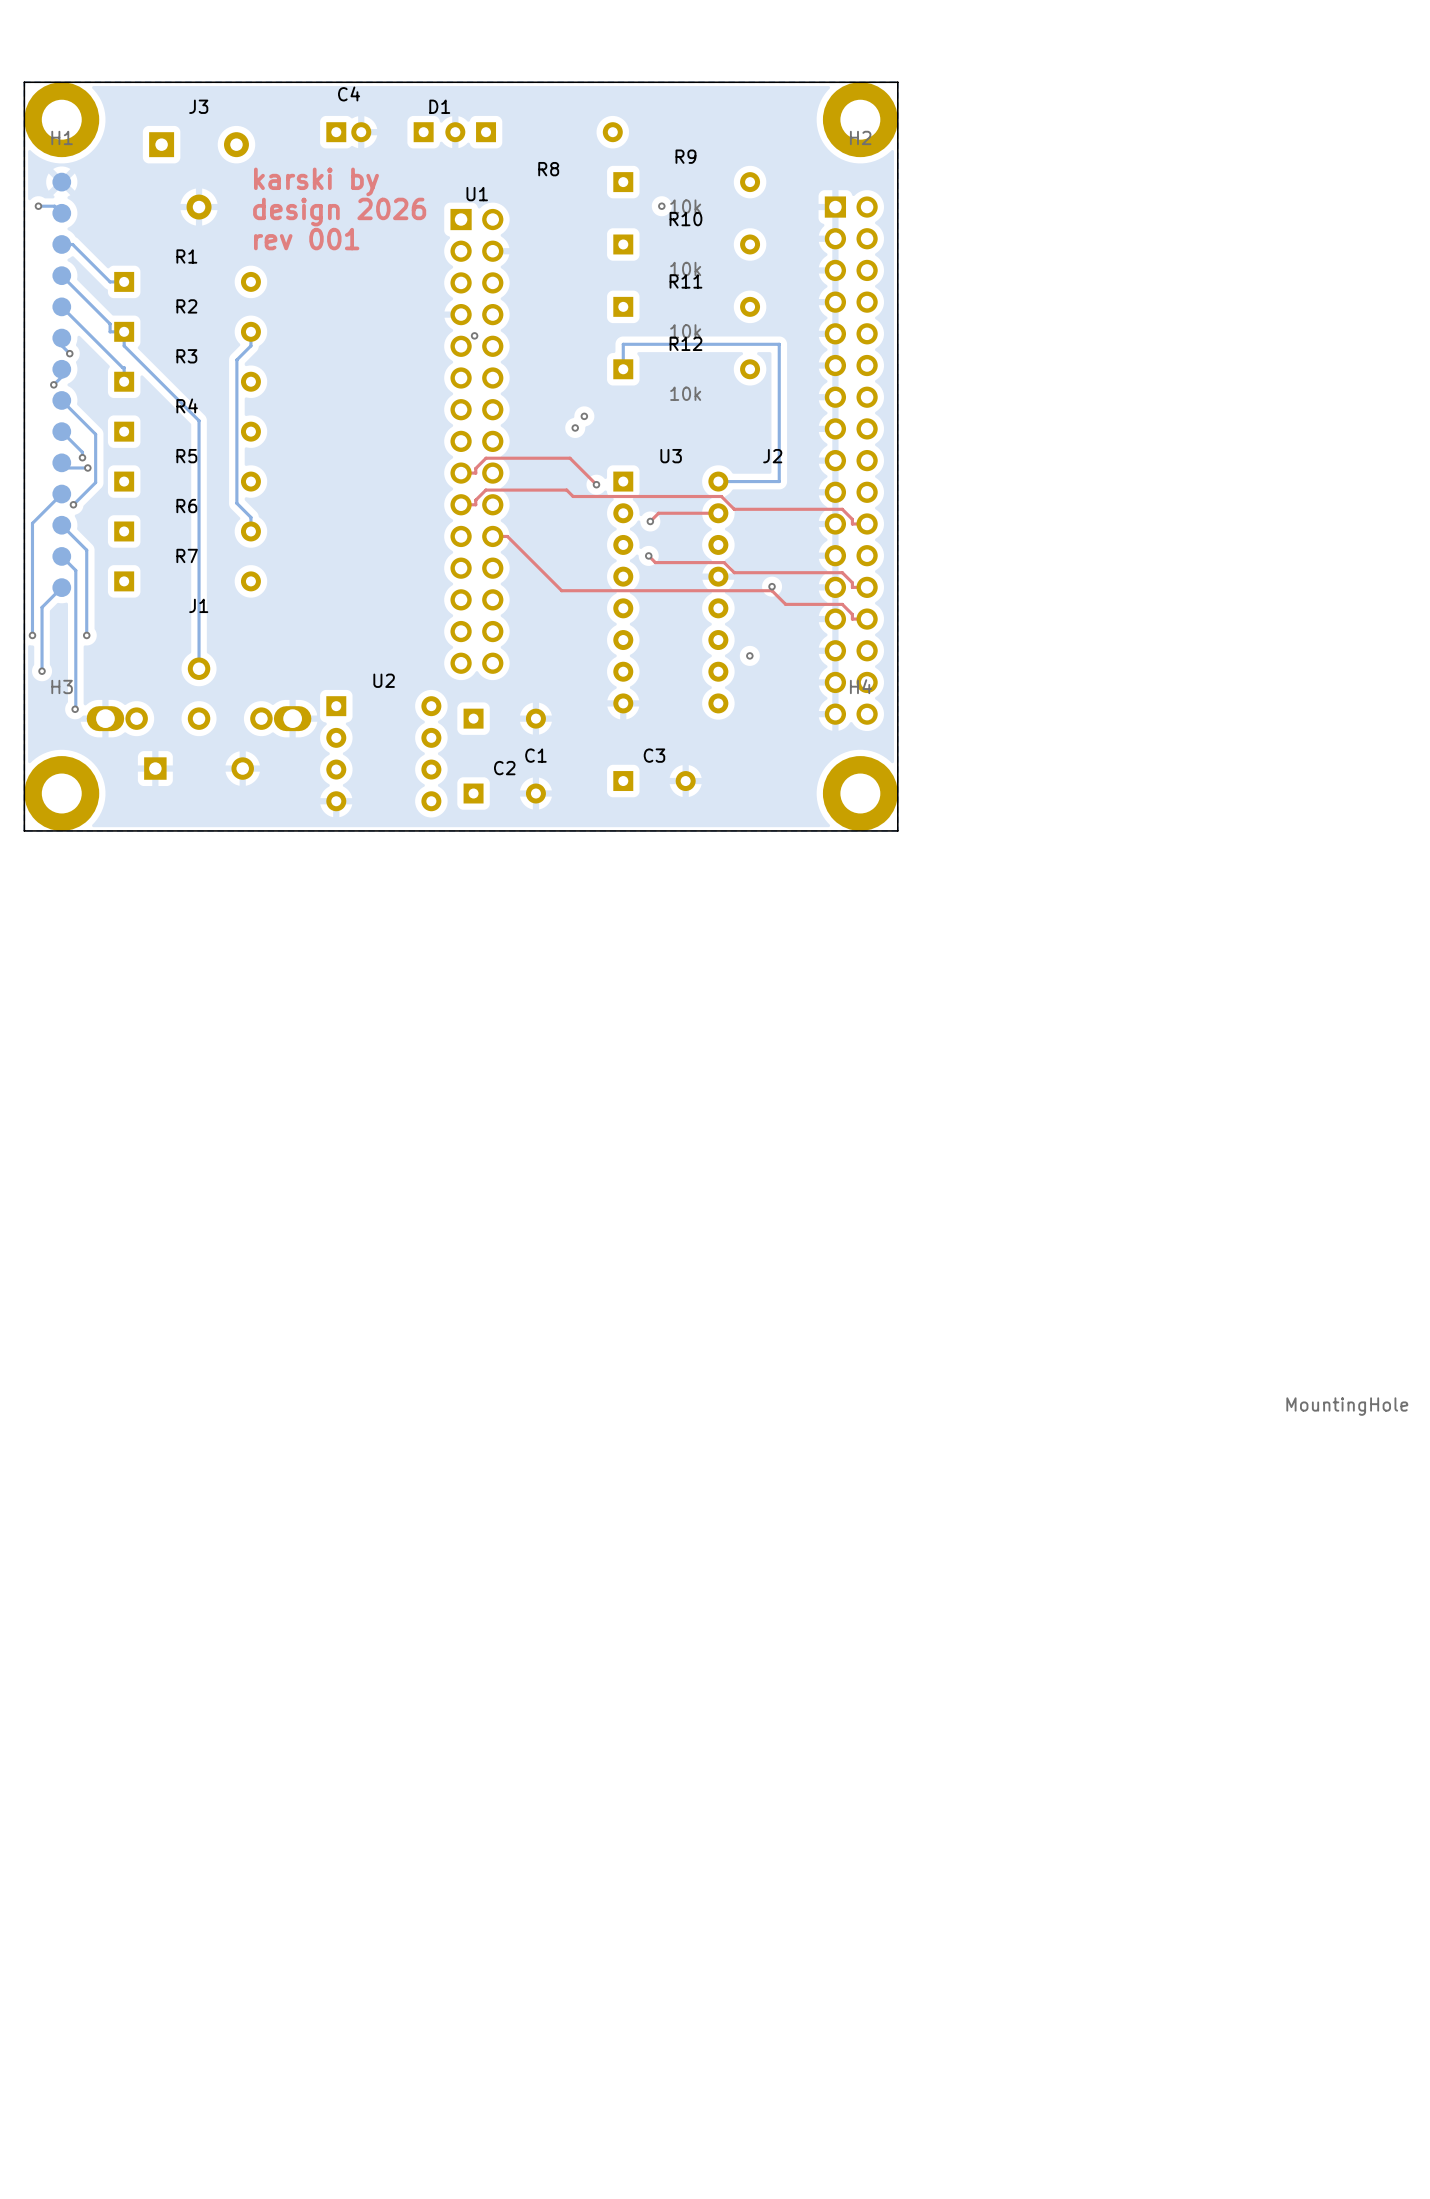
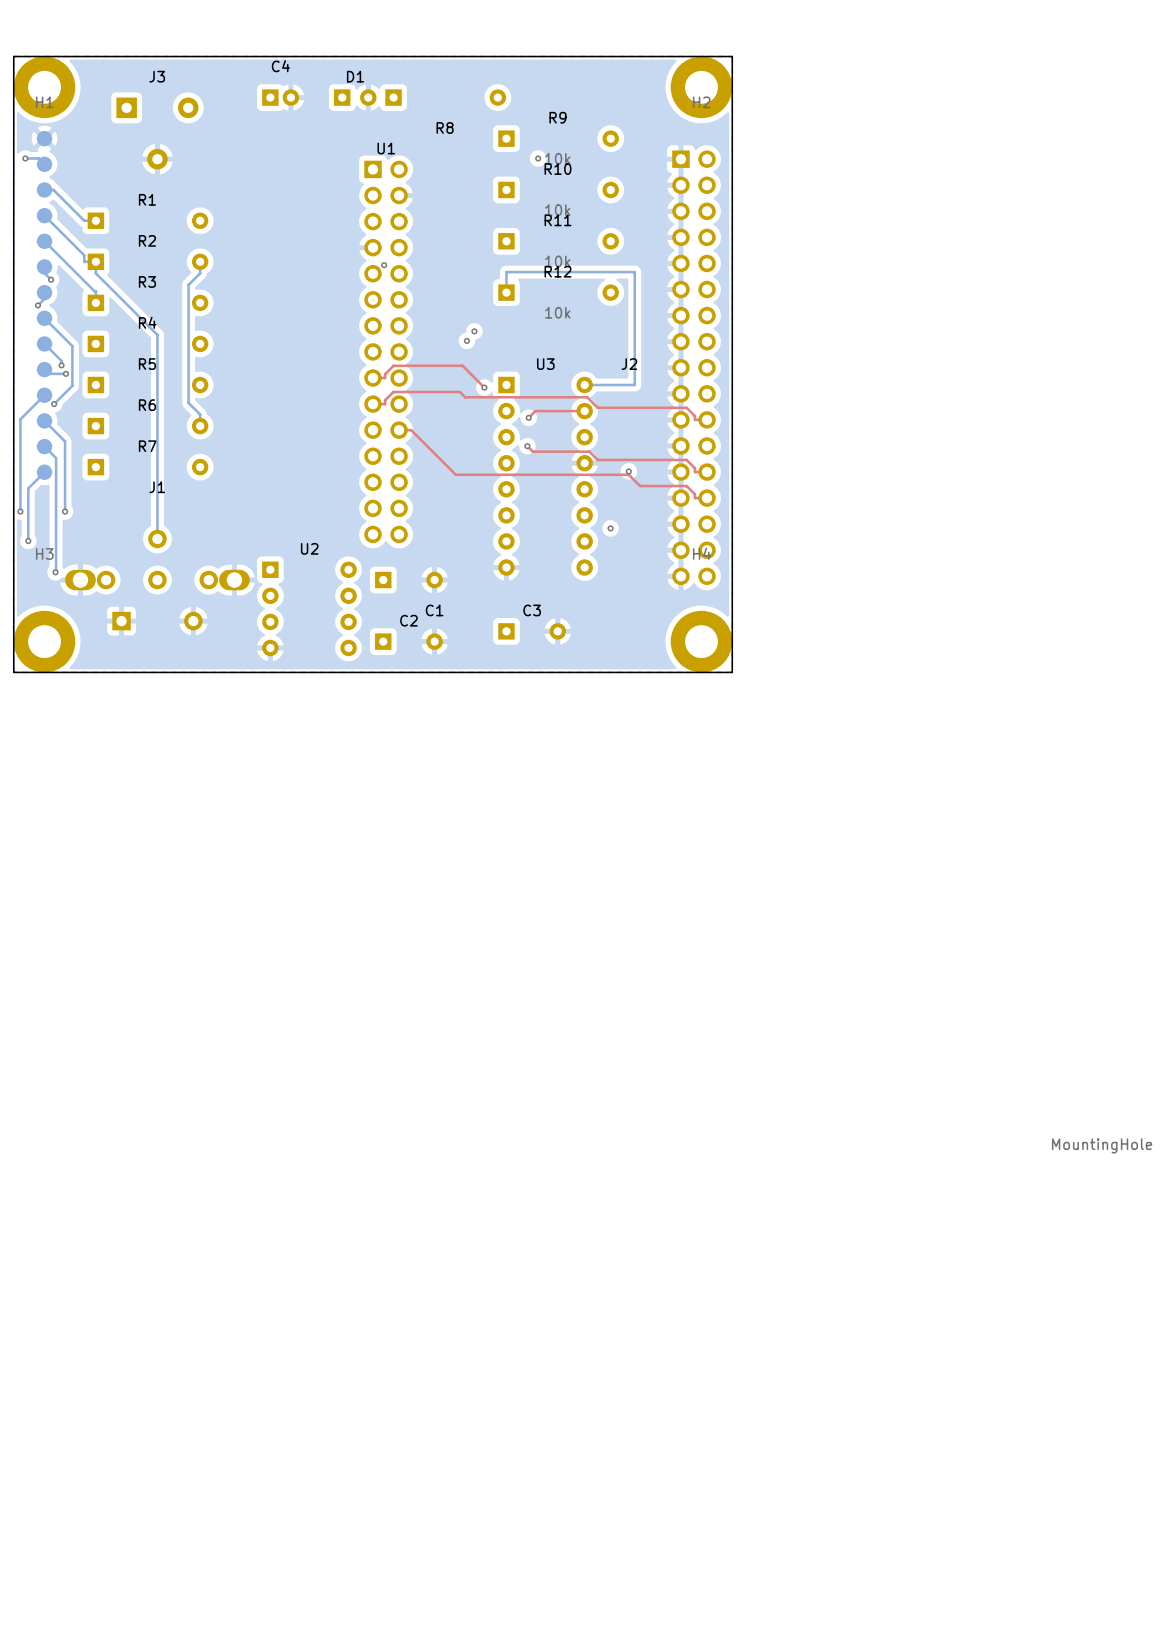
text: karski by (316, 181) -> none
text: design 2026 (339, 212) -> none
text: rev 001 (306, 239) -> none

